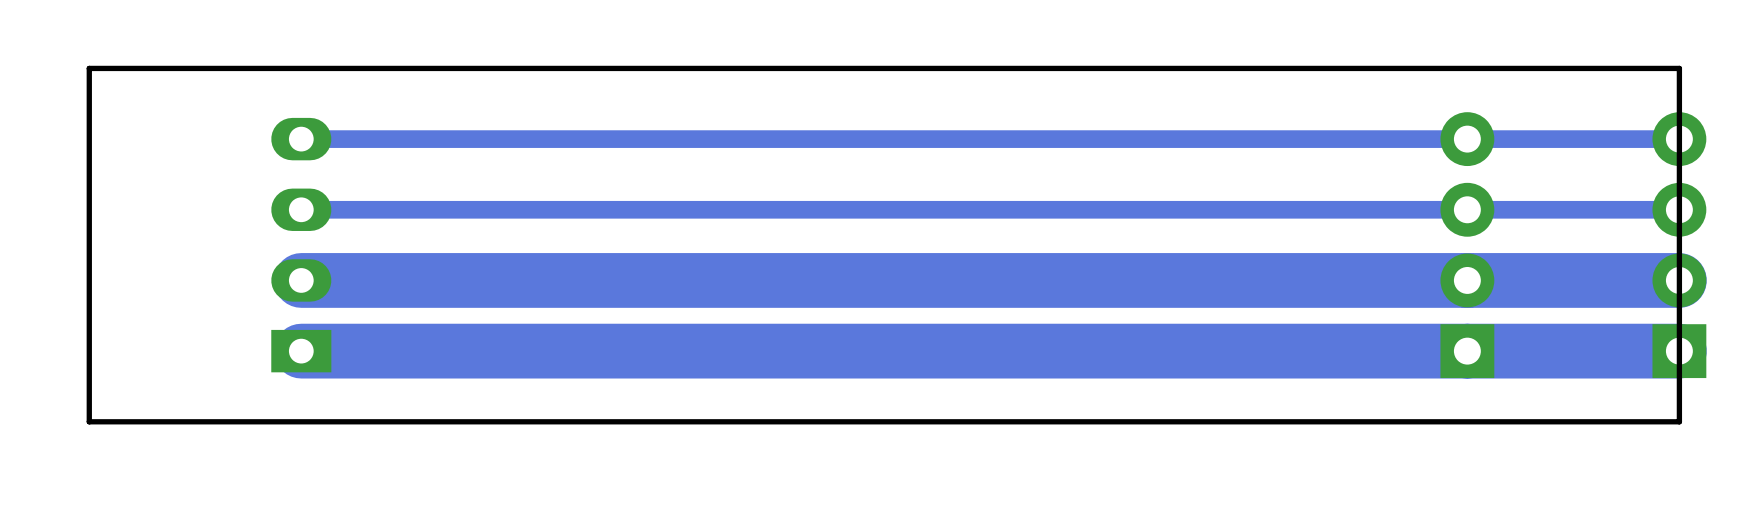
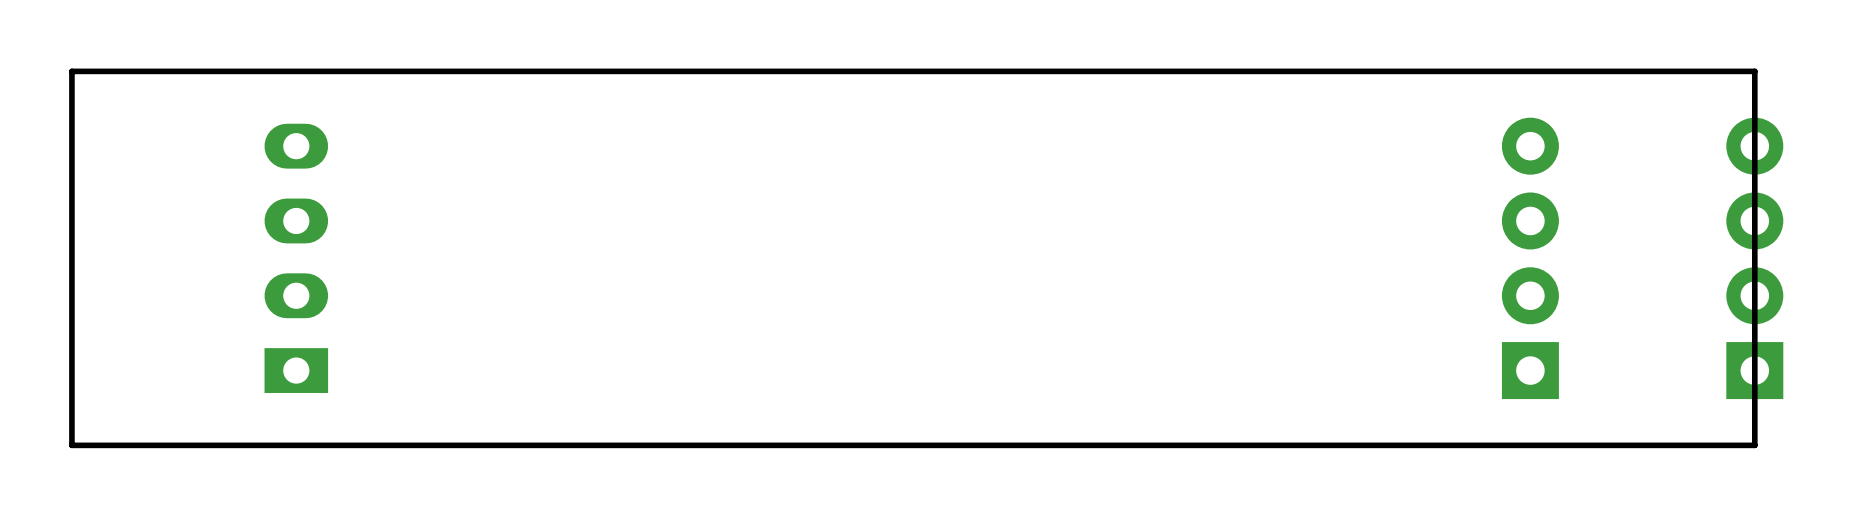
track: (1679, 139) (301, 139) -> none
track: (1679, 209) (301, 209) -> none
track: (1679, 280) (301, 280) -> none
track: (1679, 351) (301, 351) -> none

